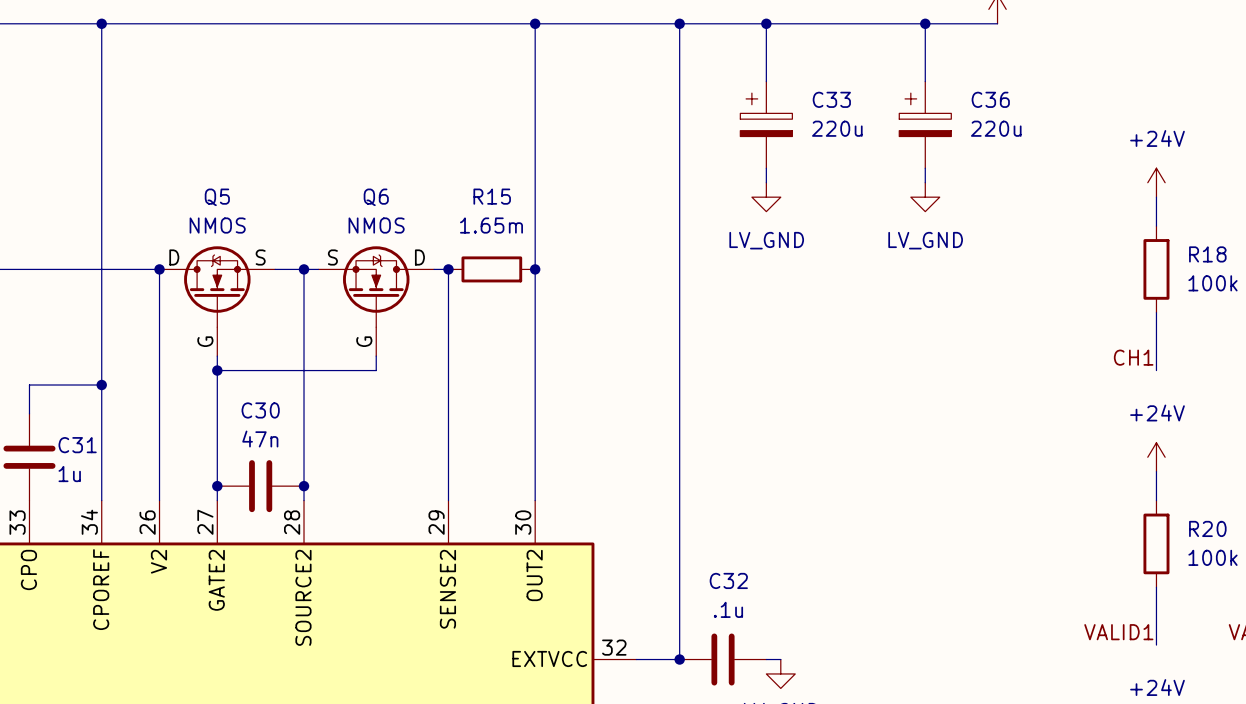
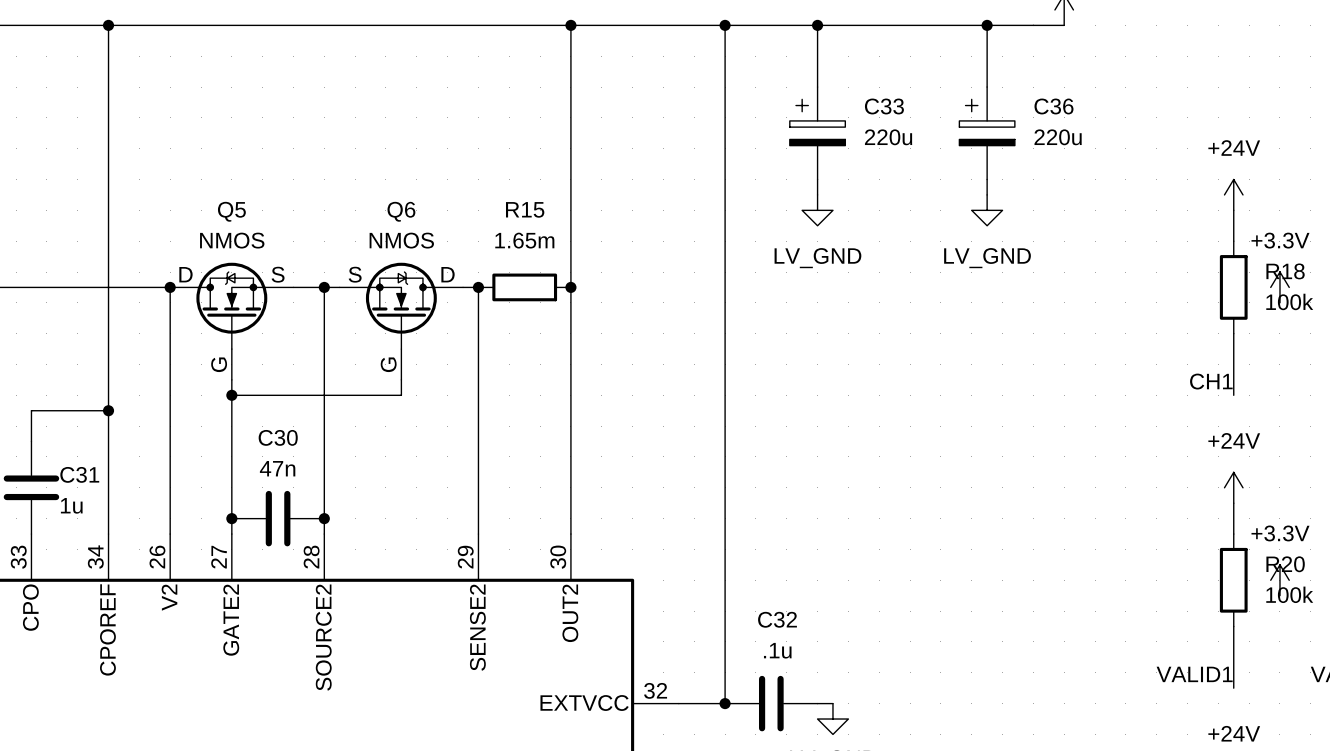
power symbol: none -> +3.3V (1279, 287)
power symbol: none -> +3.3V (1279, 580)

